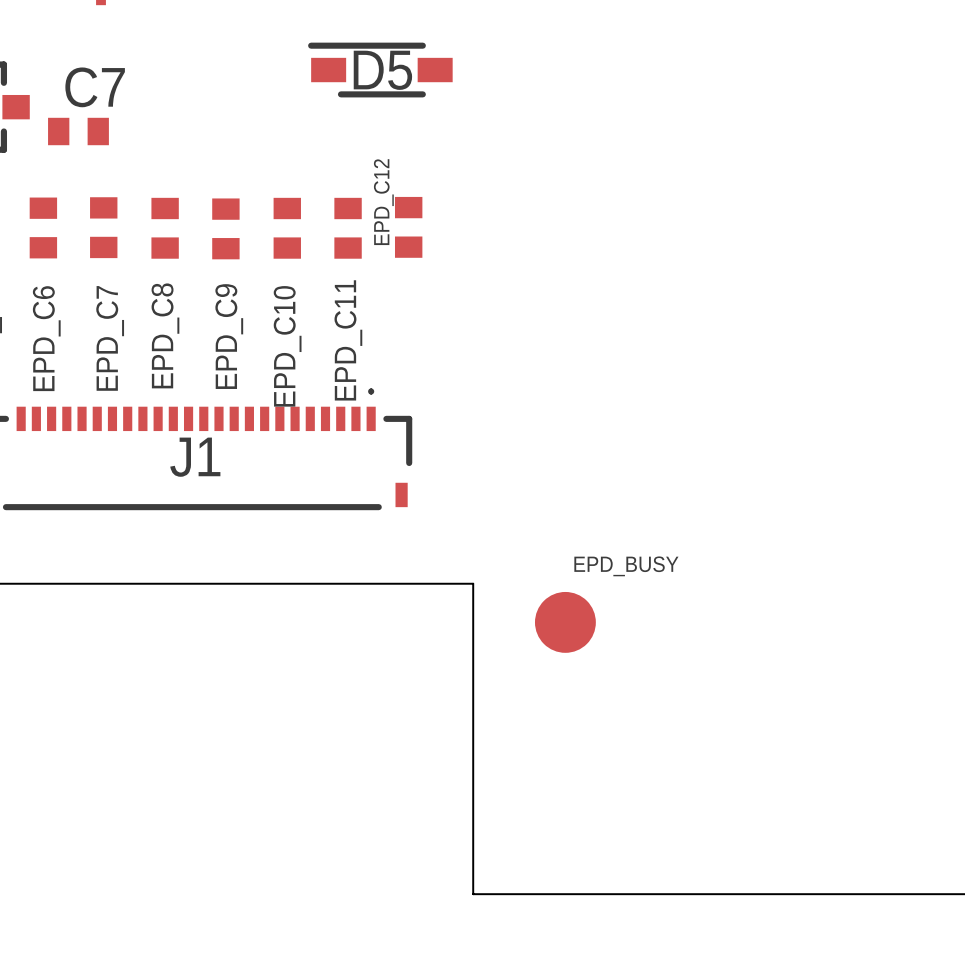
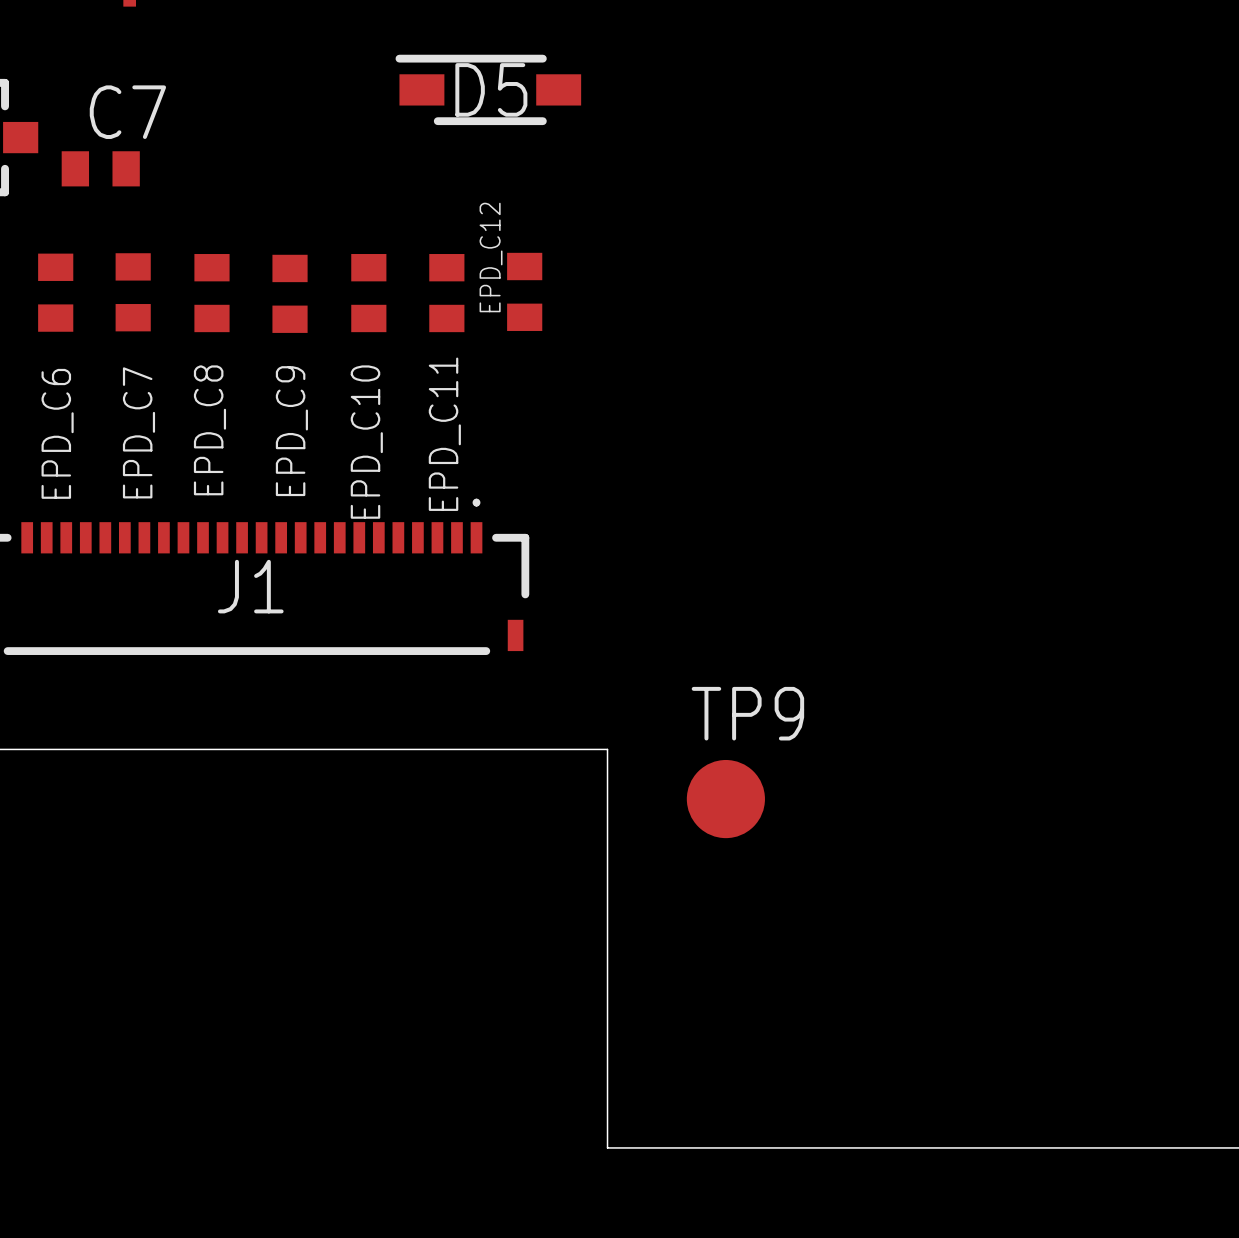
TP9 name: none -> TP9 (747, 713)
text: EPD_BUSY (626, 566) -> none

